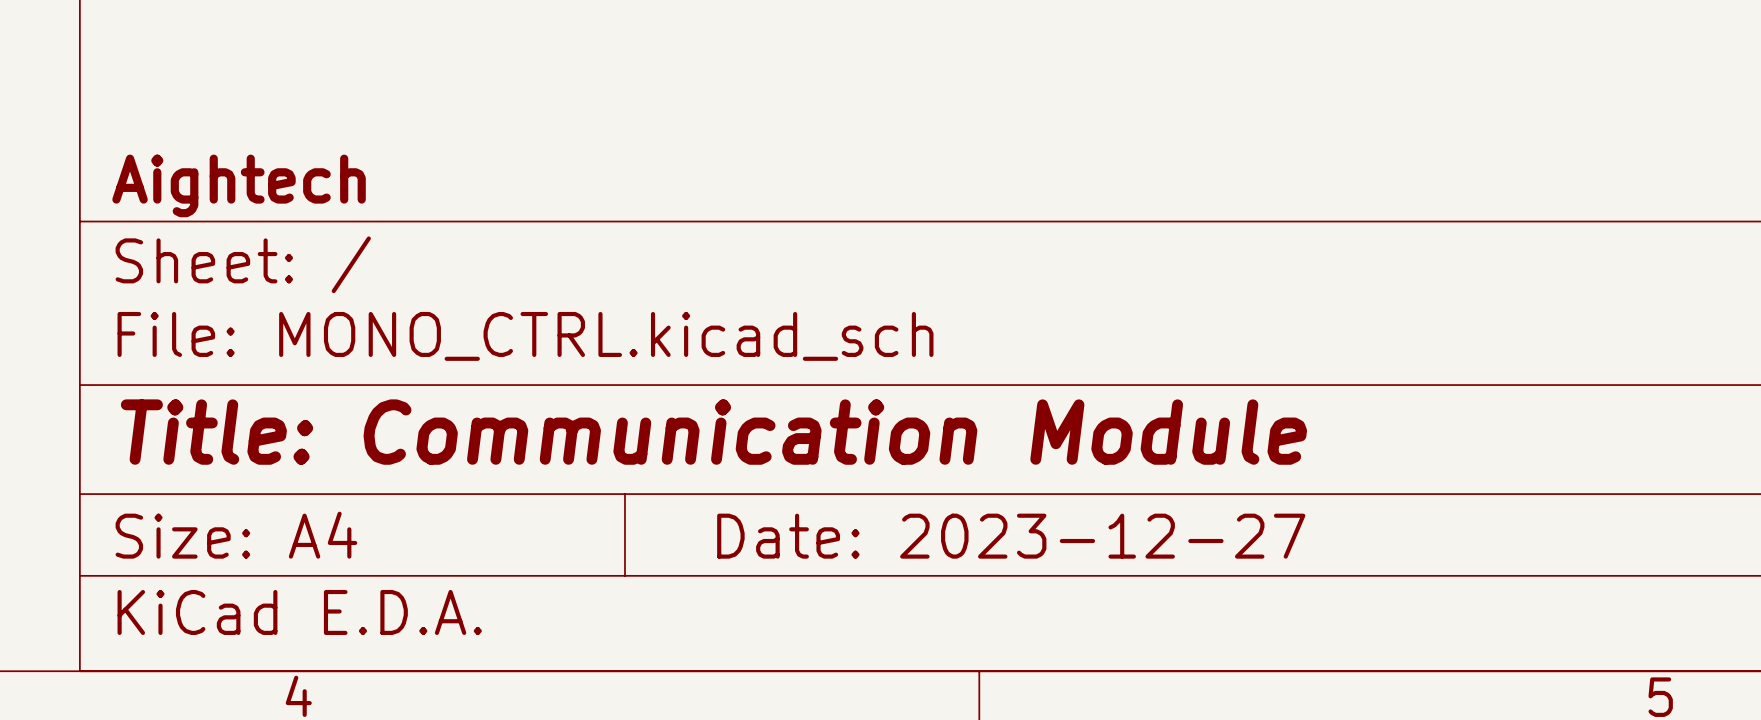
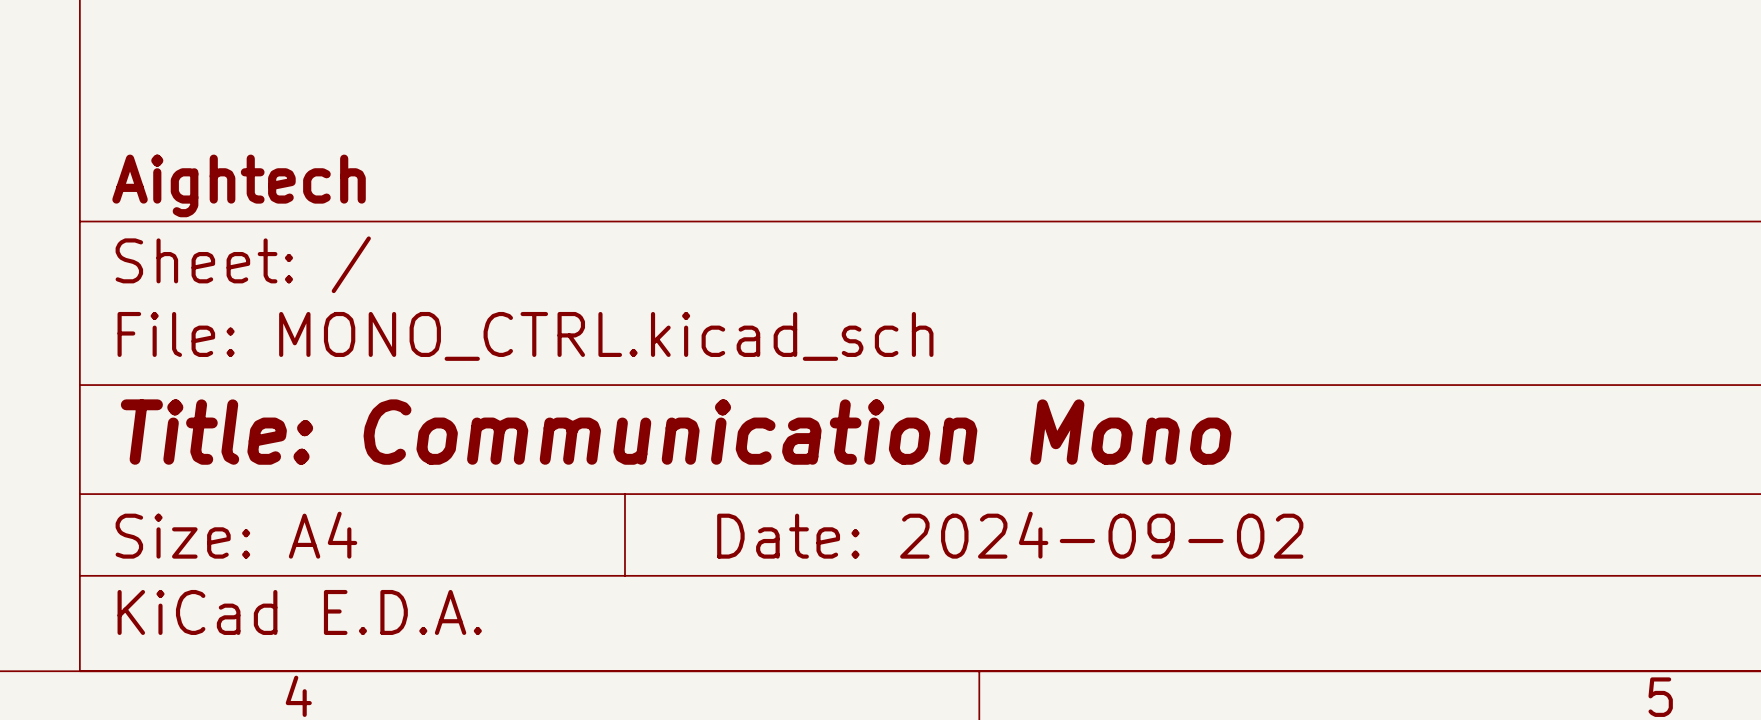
title block: Title: Communication Module (713, 432) -> Title: Communication Mono (676, 432)
title block: Date: 2023-12-27 (1011, 536) -> Date: 2024-09-02 (1010, 535)

